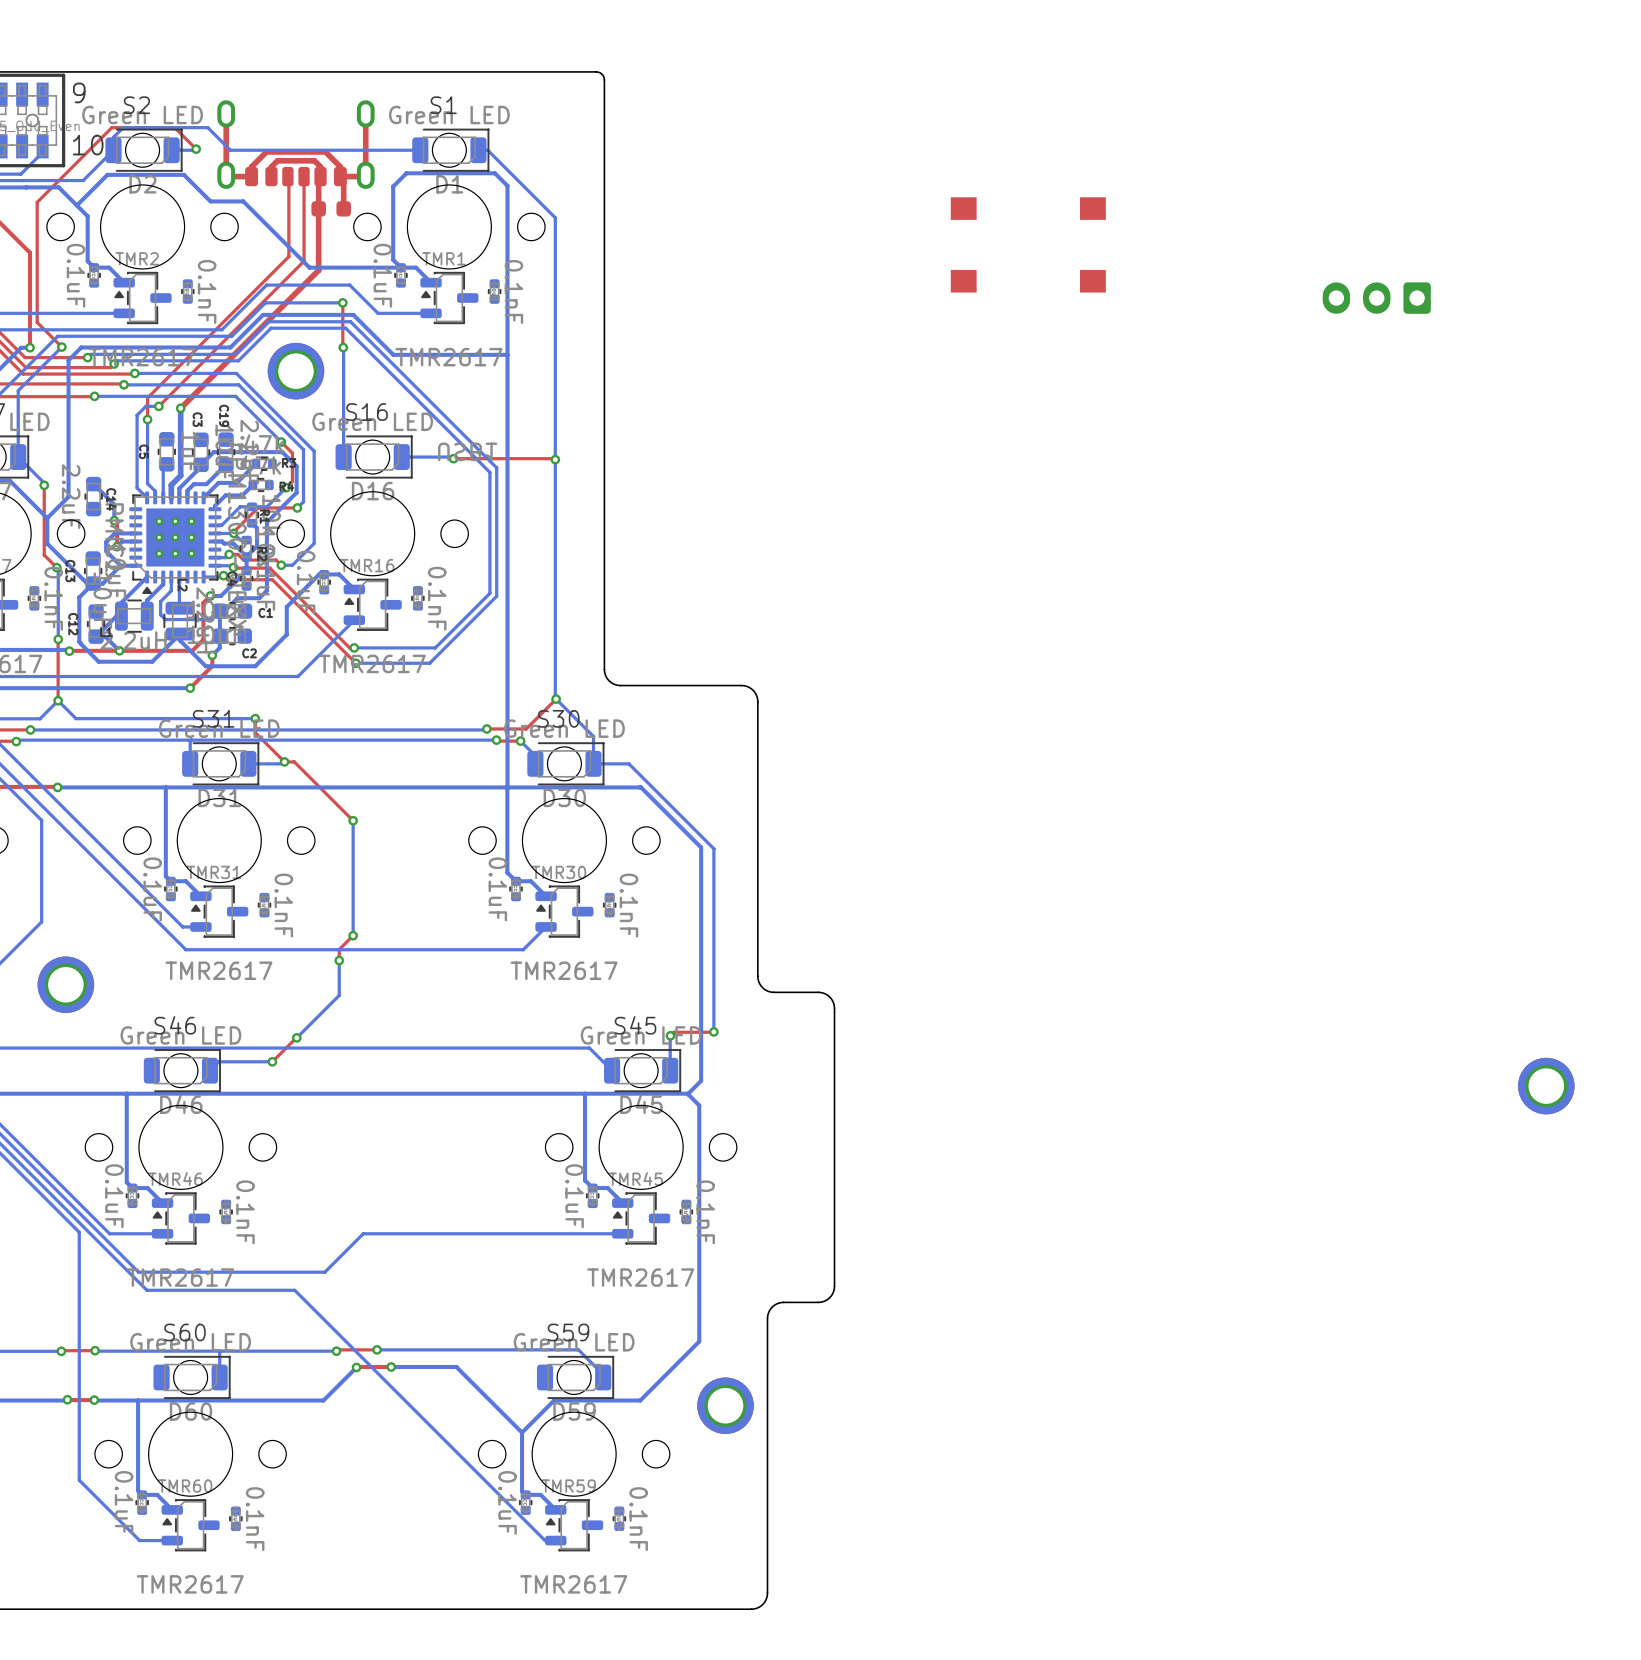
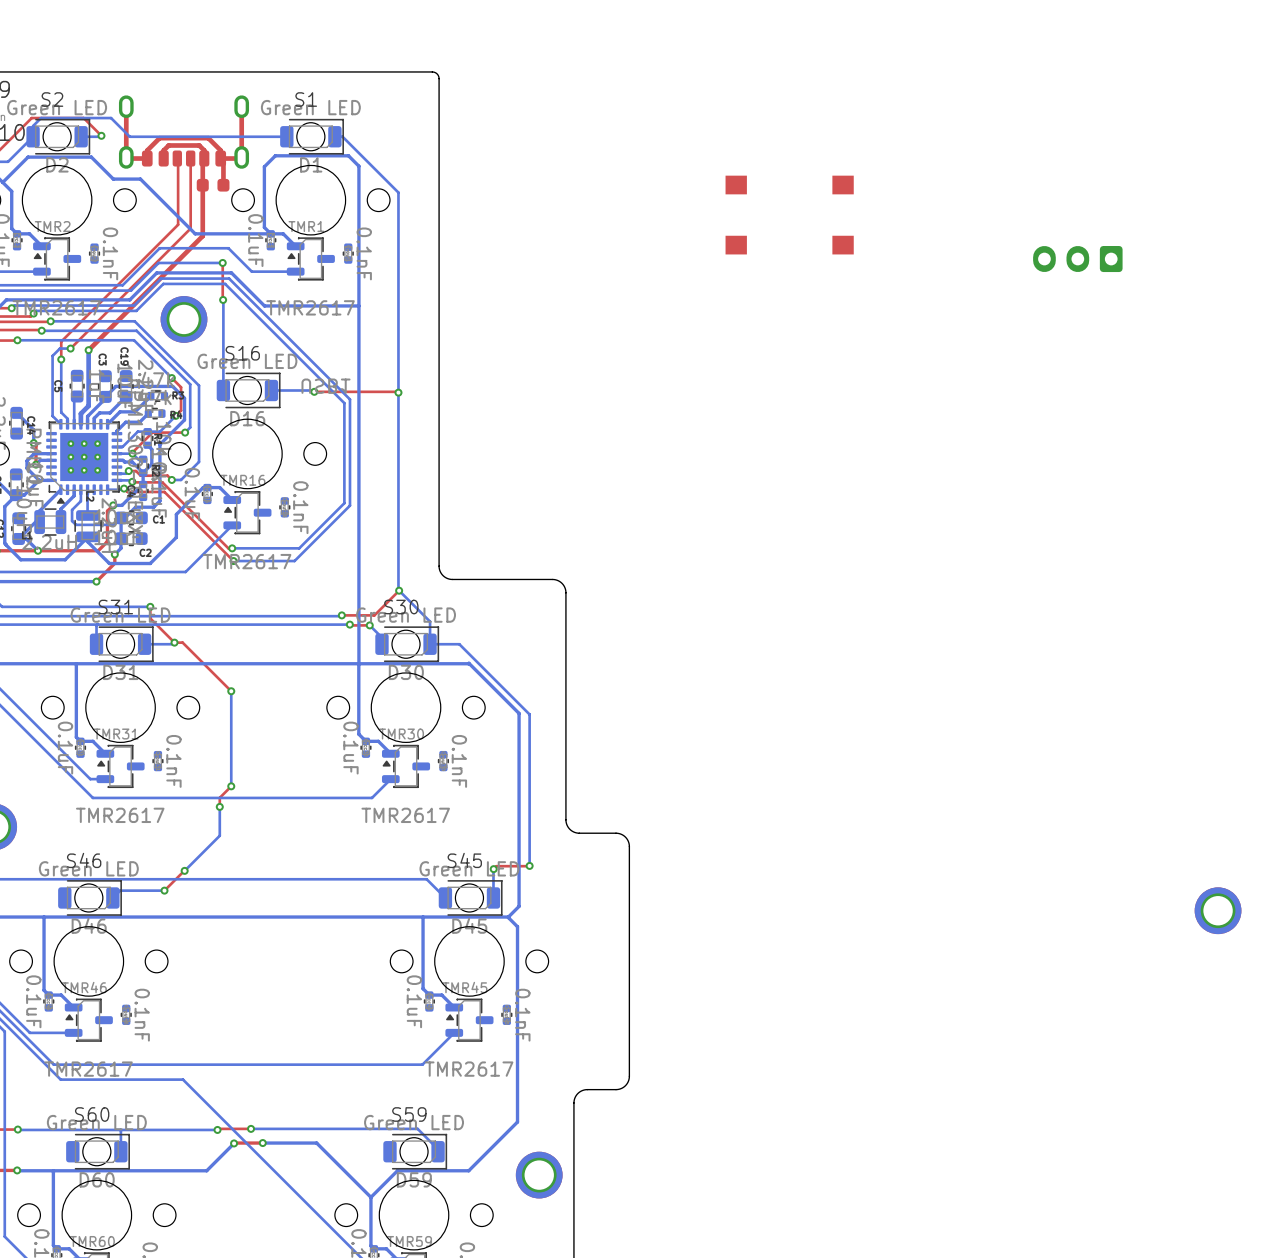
bottom track: (622, 1233) (363, 1233) (324, 1272) -> (454, 1032) (422, 1064) (207, 1064)

